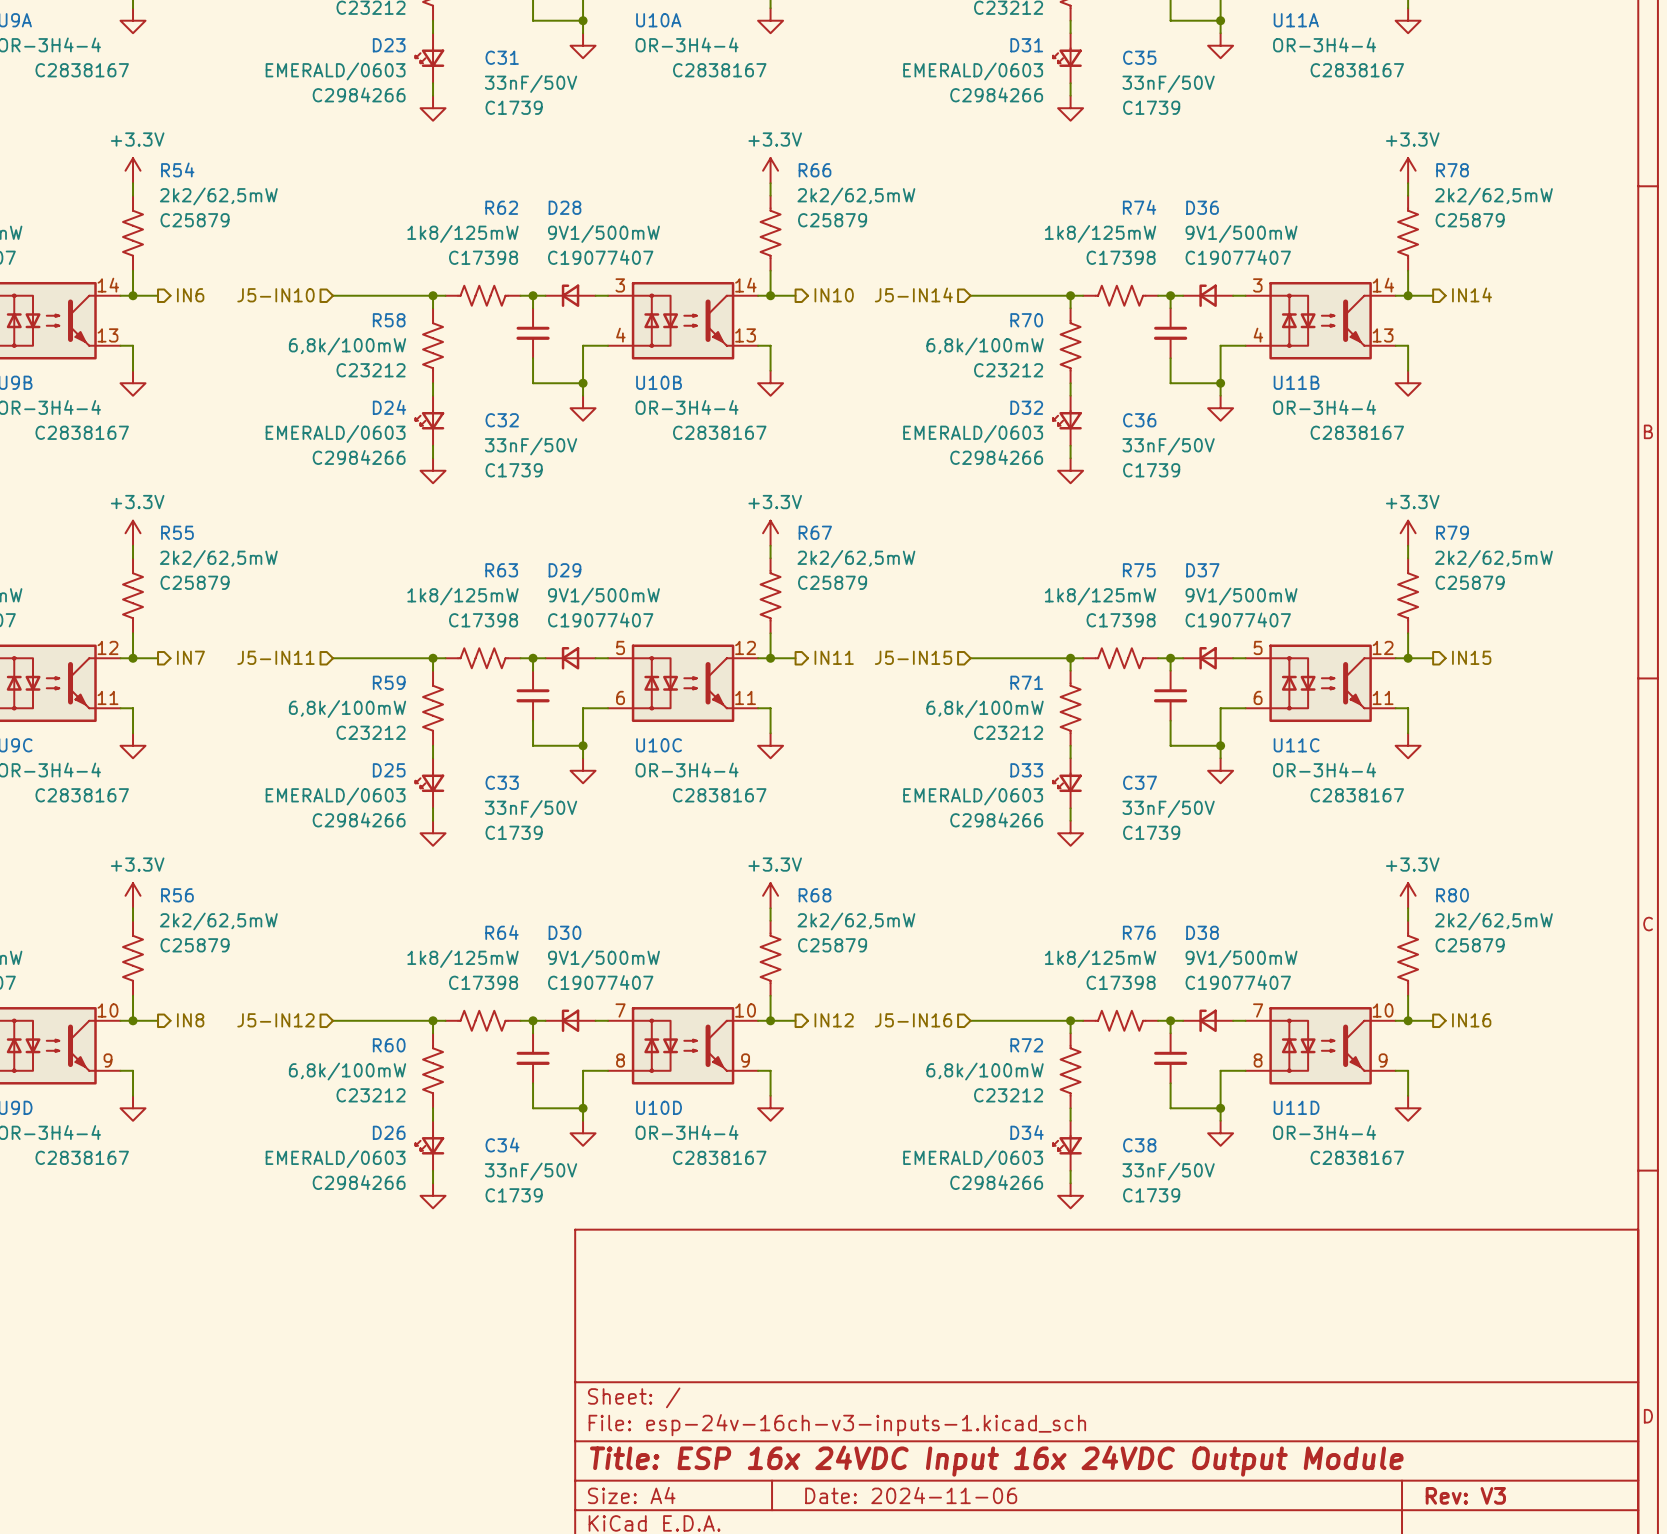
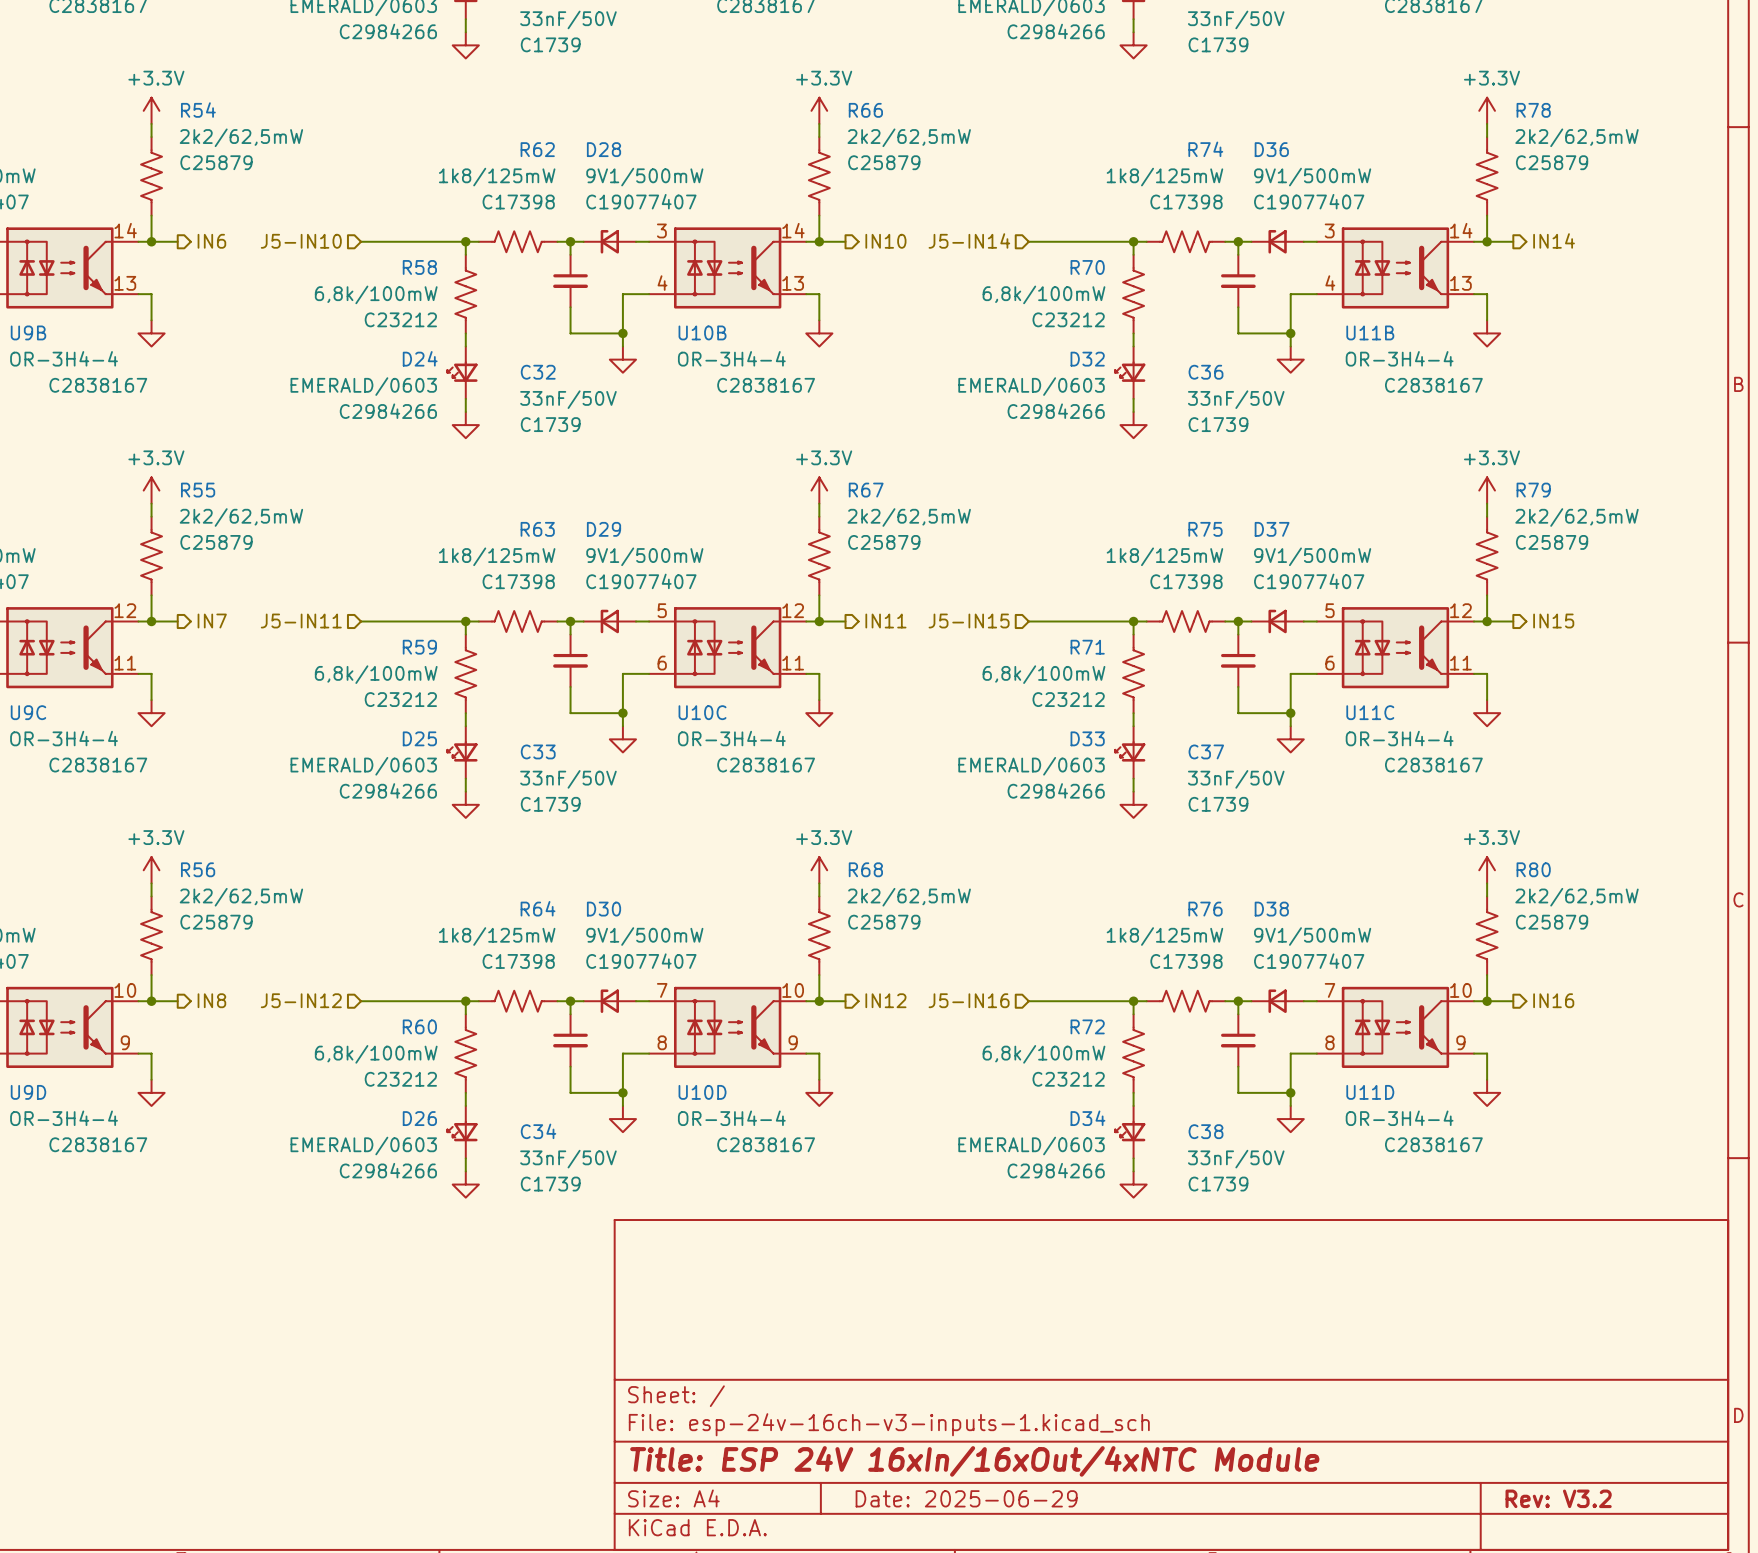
title block: Title: ESP 16x 24VDC Input 16x 24VDC Output Module (996, 1461) -> Title: ESP 24V 16xIn/16xOut/4xNTC Module (974, 1461)
title block: Date: 2024-11-06 (911, 1495) -> Date: 2025-06-29 (966, 1498)
title block: Rev: V3 (1465, 1495) -> Rev: V3.2 (1558, 1498)

